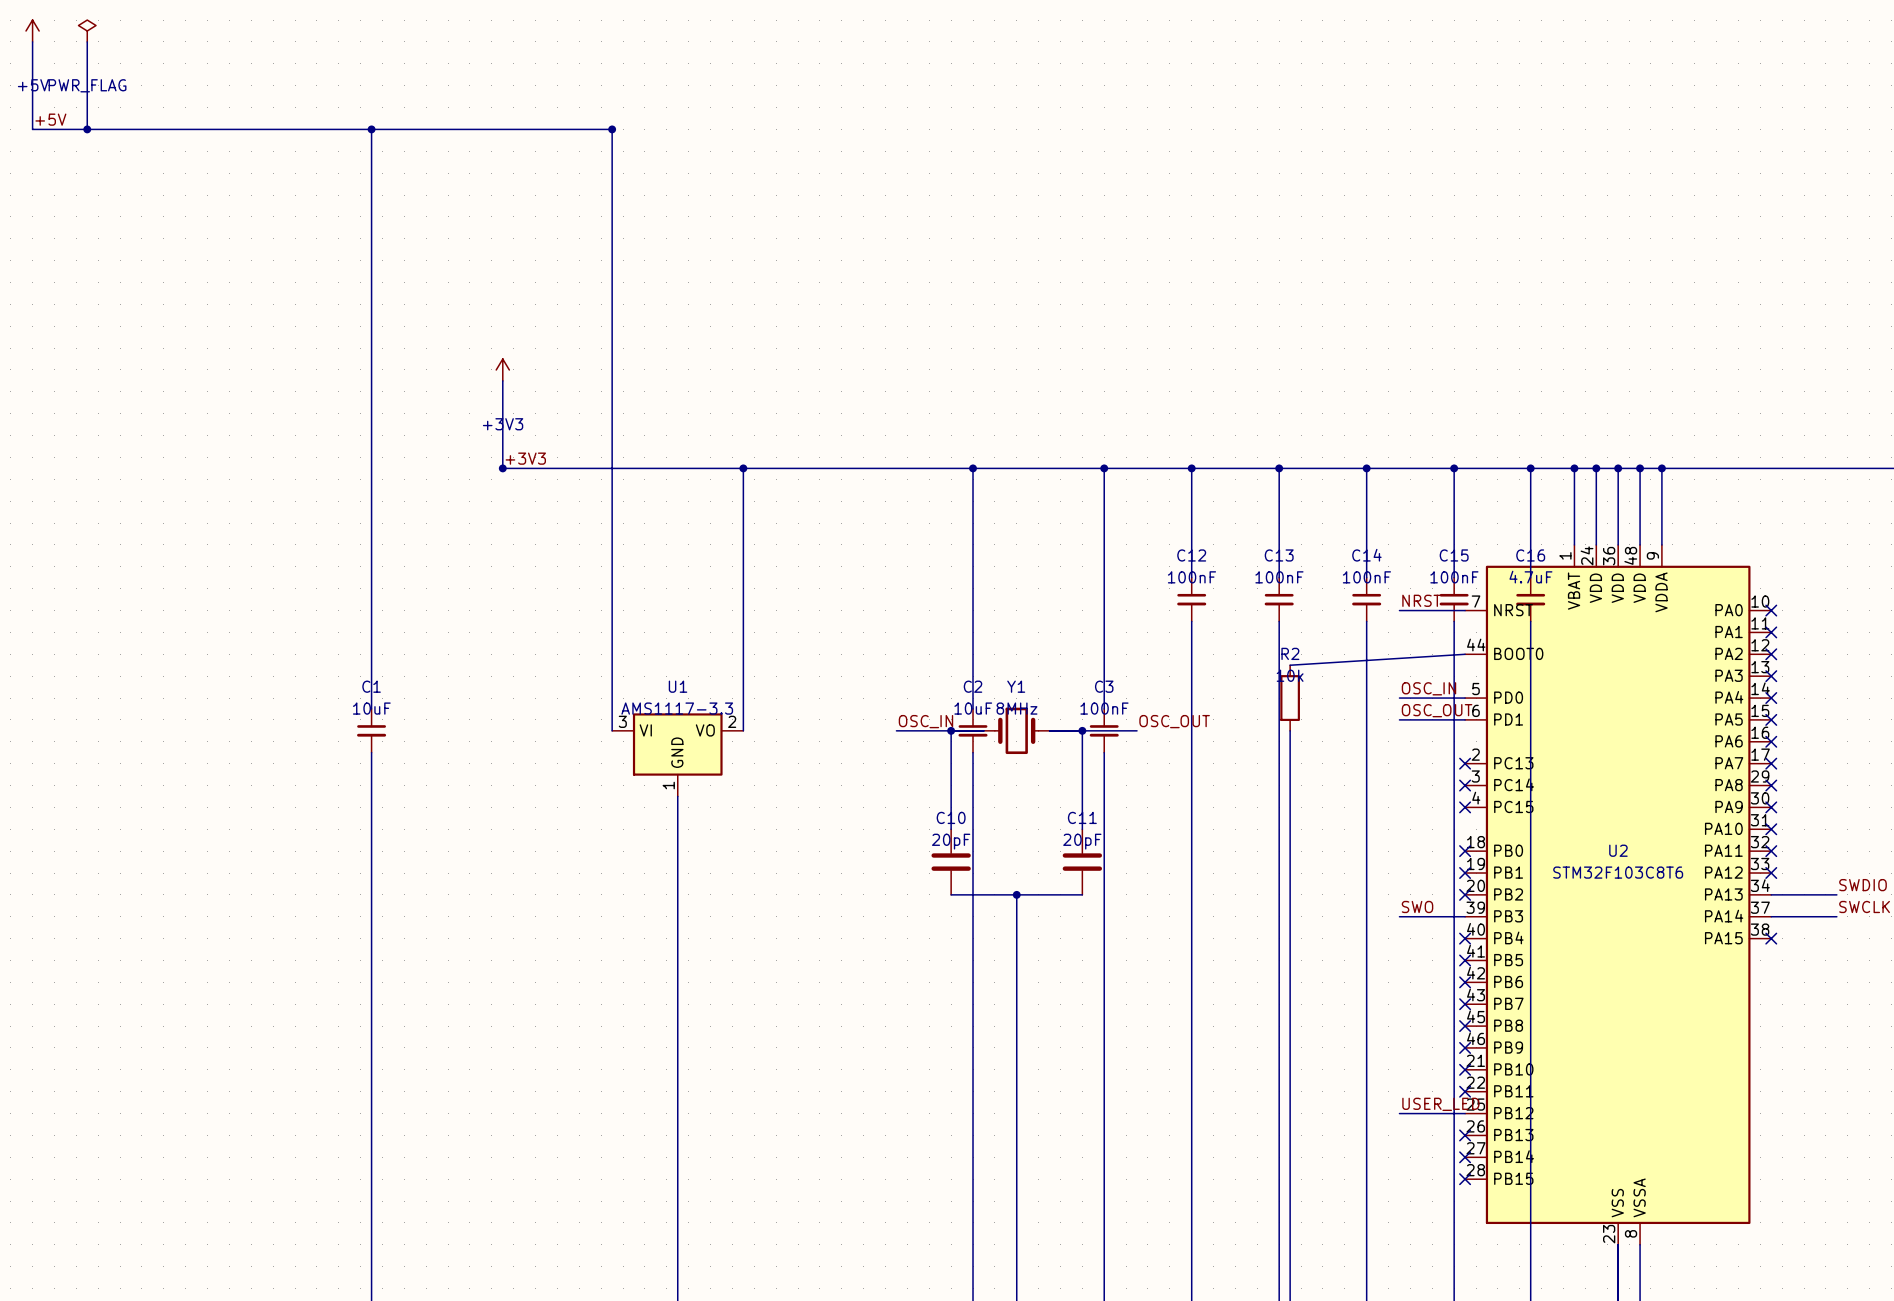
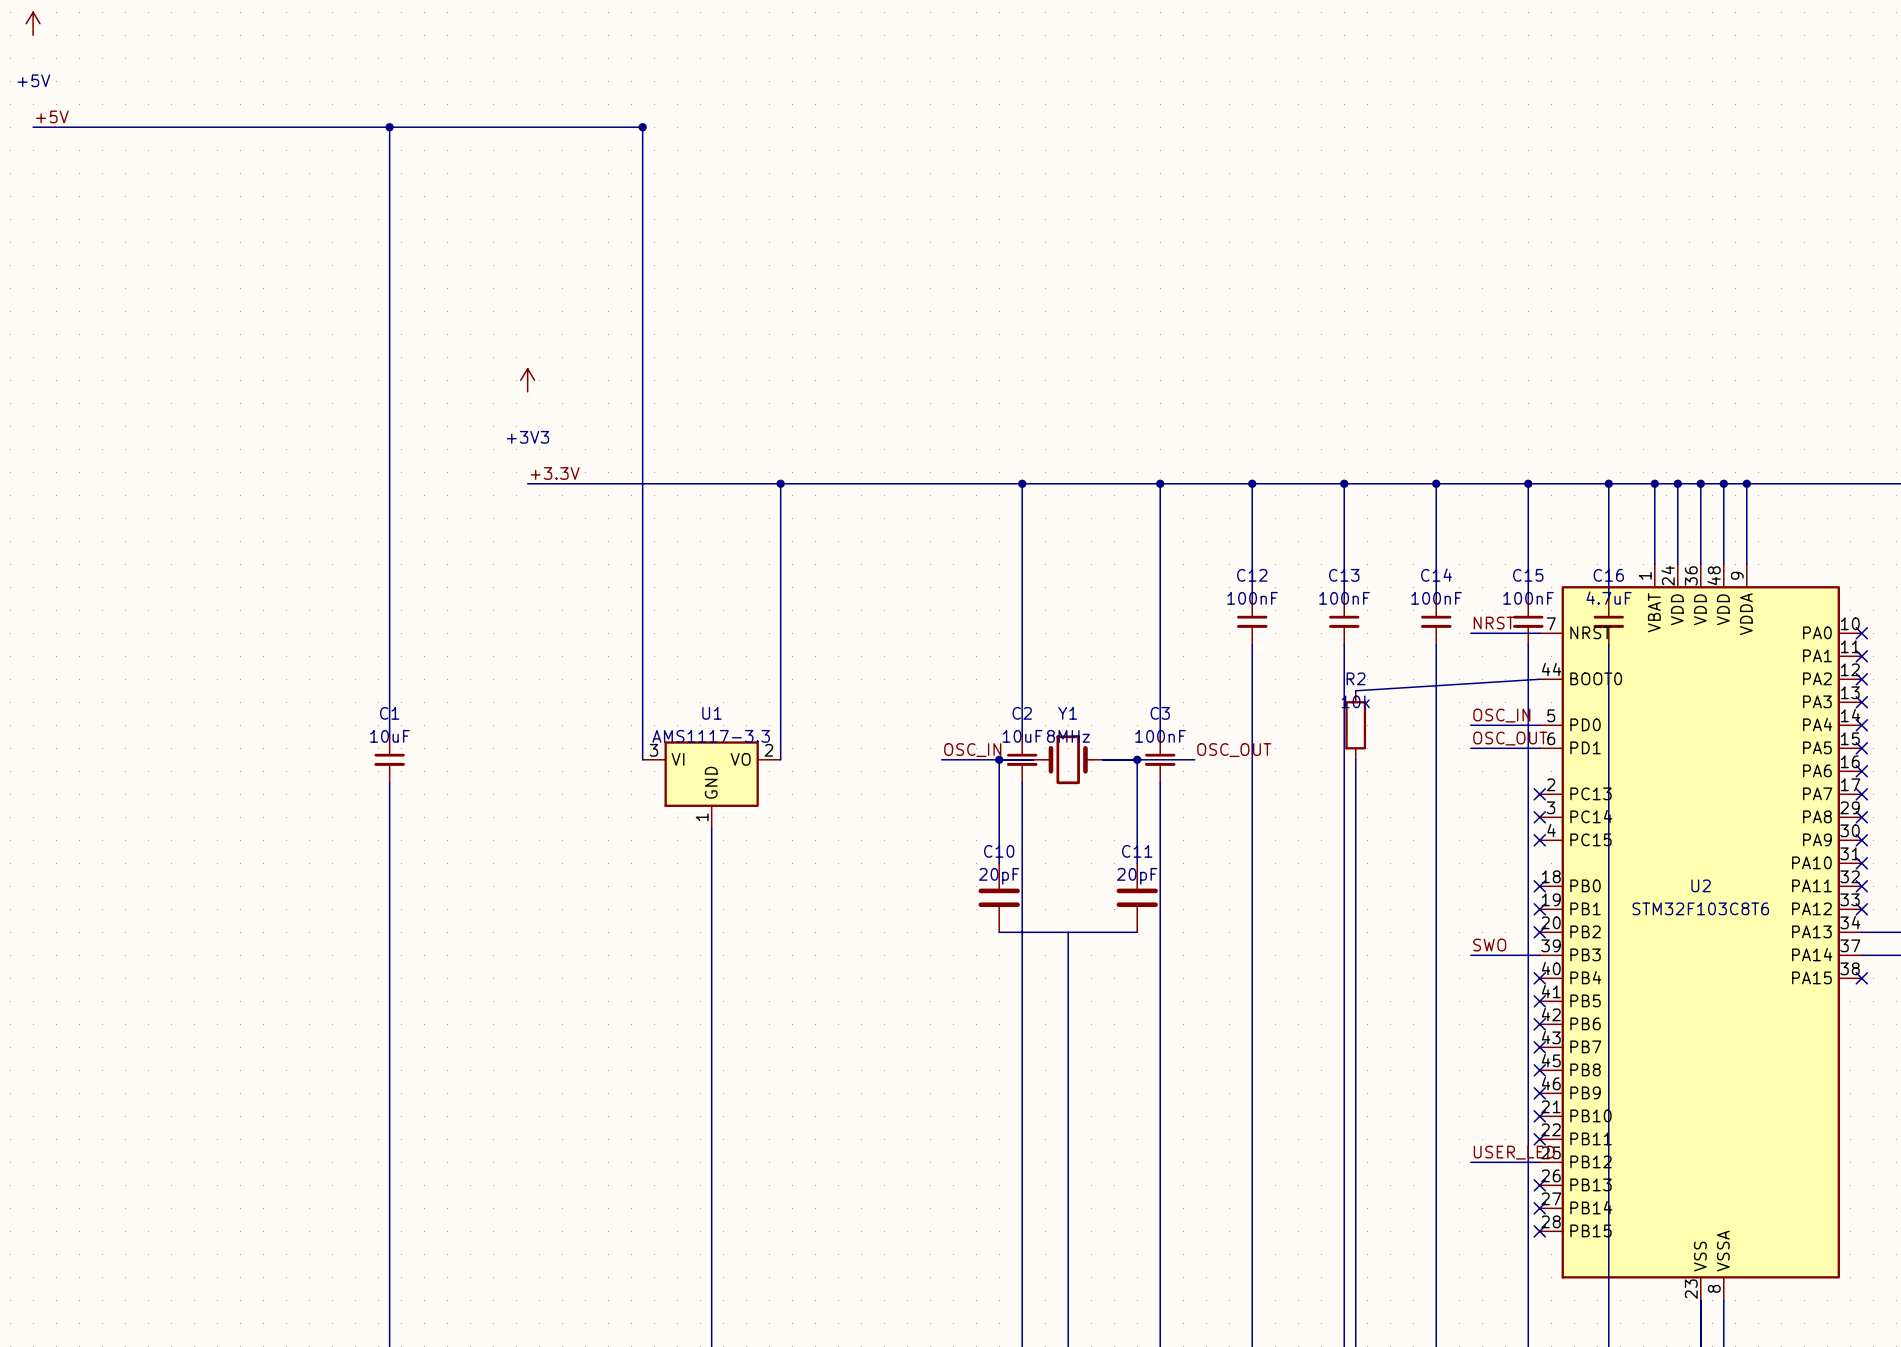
power symbol: PWR_FLAG (87, 31) -> none
wire: (32, 41) (32, 129) -> none
wire: (87, 41) (87, 129) -> none
junction: (87, 129) -> none
wire: (502, 380) (502, 468) -> none
label: +3V3 (525, 458) -> +3.3V (555, 473)
junction: (502, 468) -> none
junction: (1016, 894) -> none

